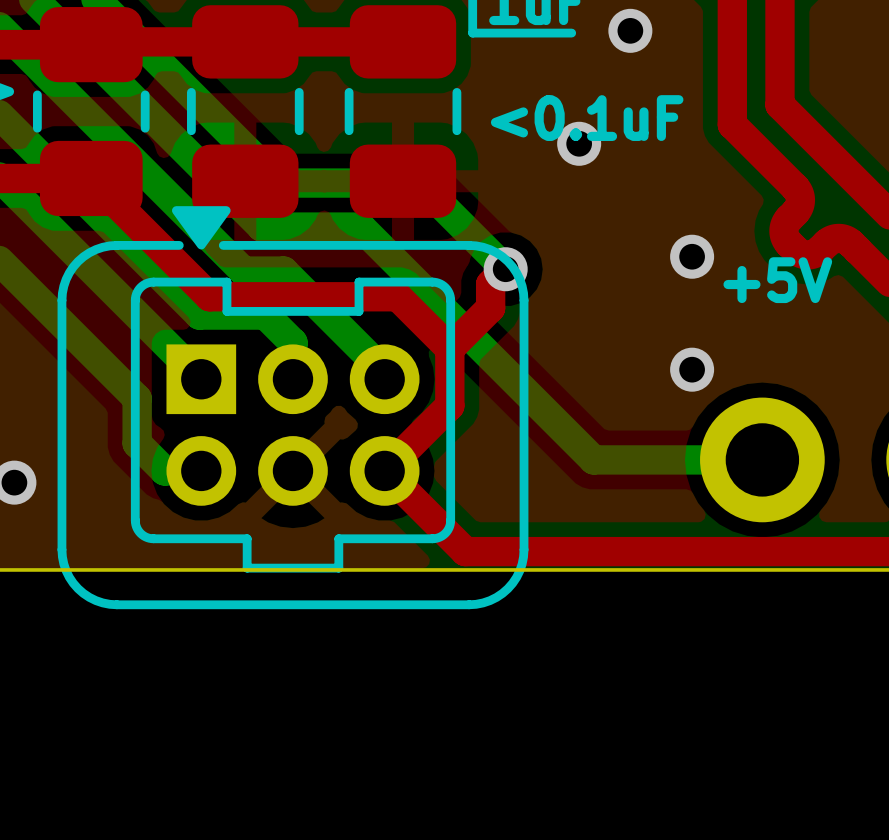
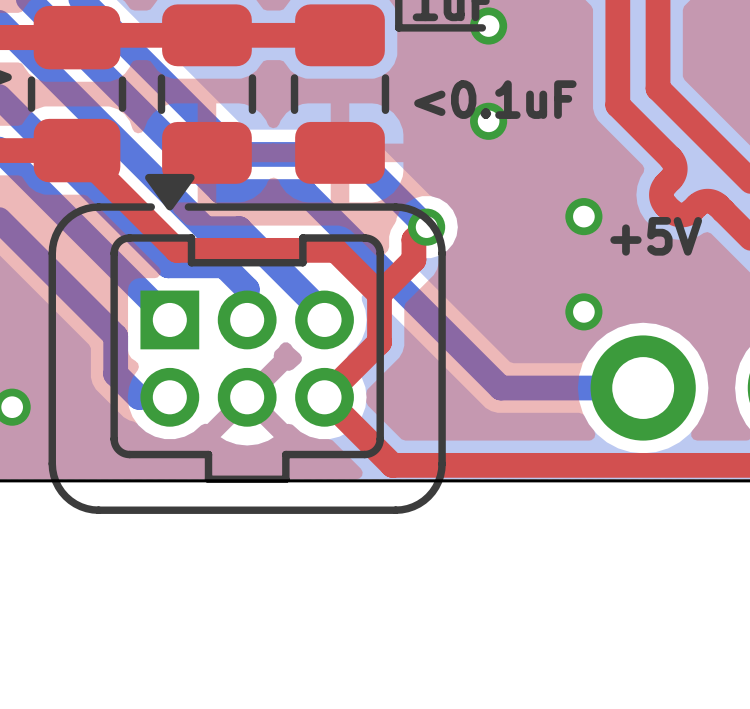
via position: (630, 30) -> (488, 26)

